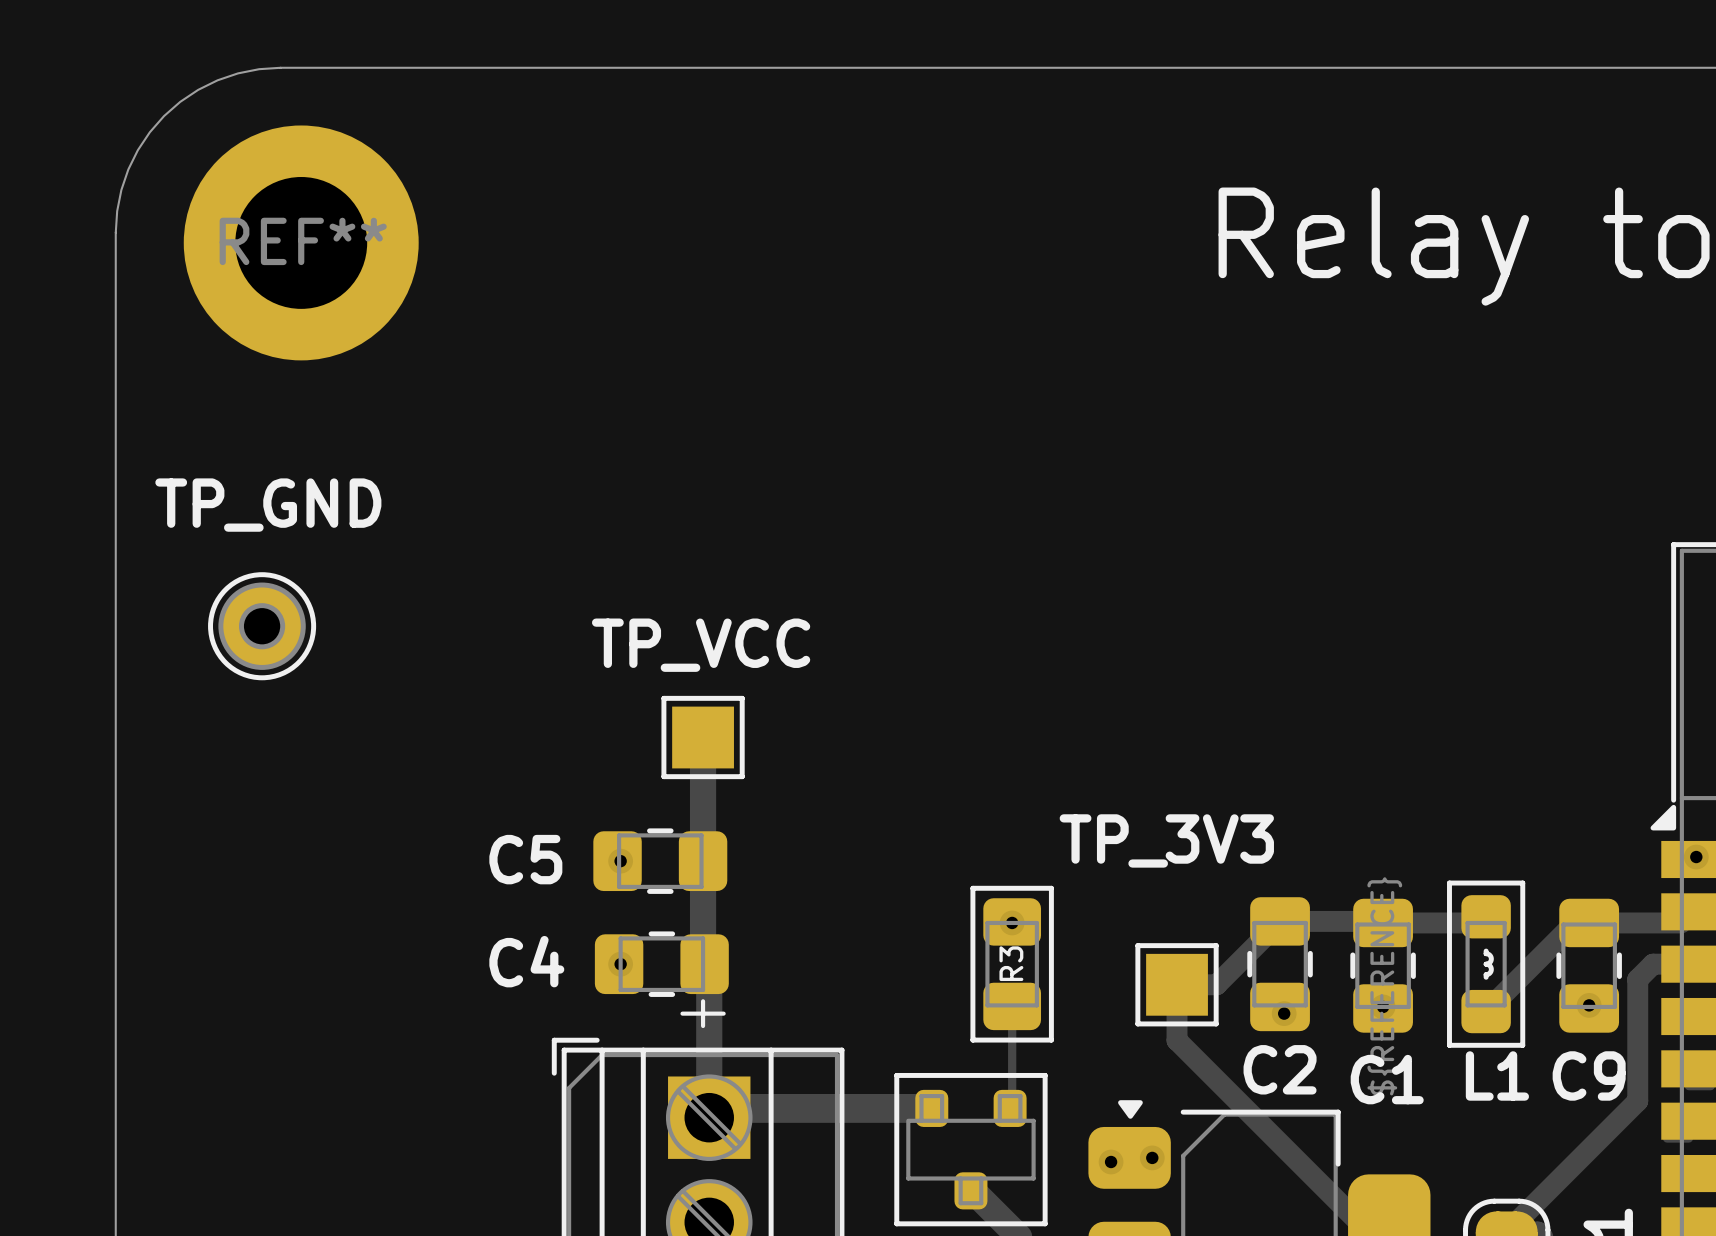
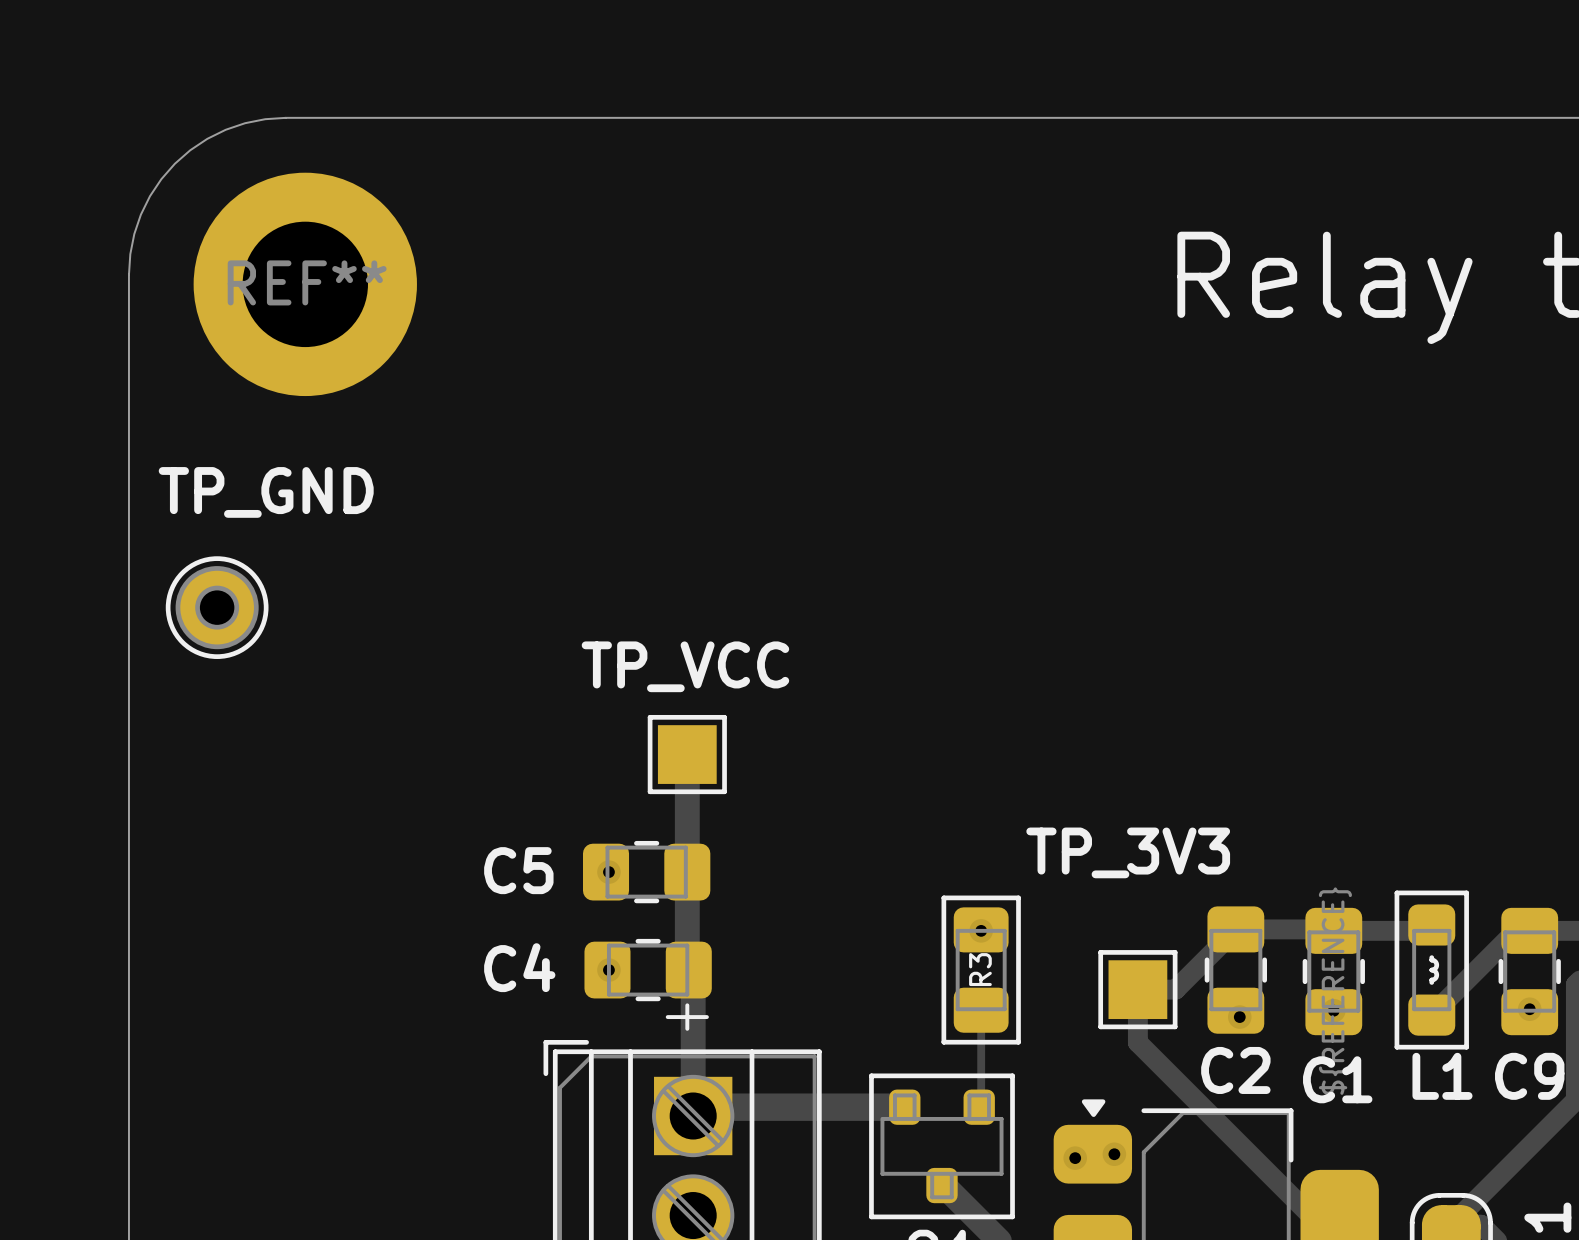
text position: TP_GND (268, 505) -> TP_GND (266, 492)
part position: (262, 626) -> (217, 607)

